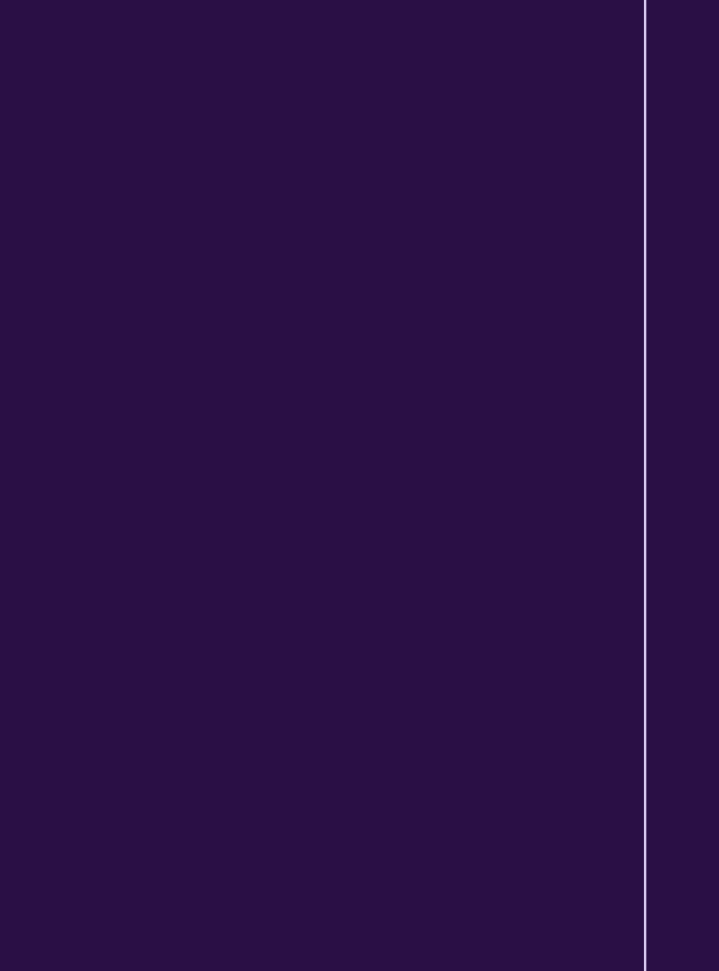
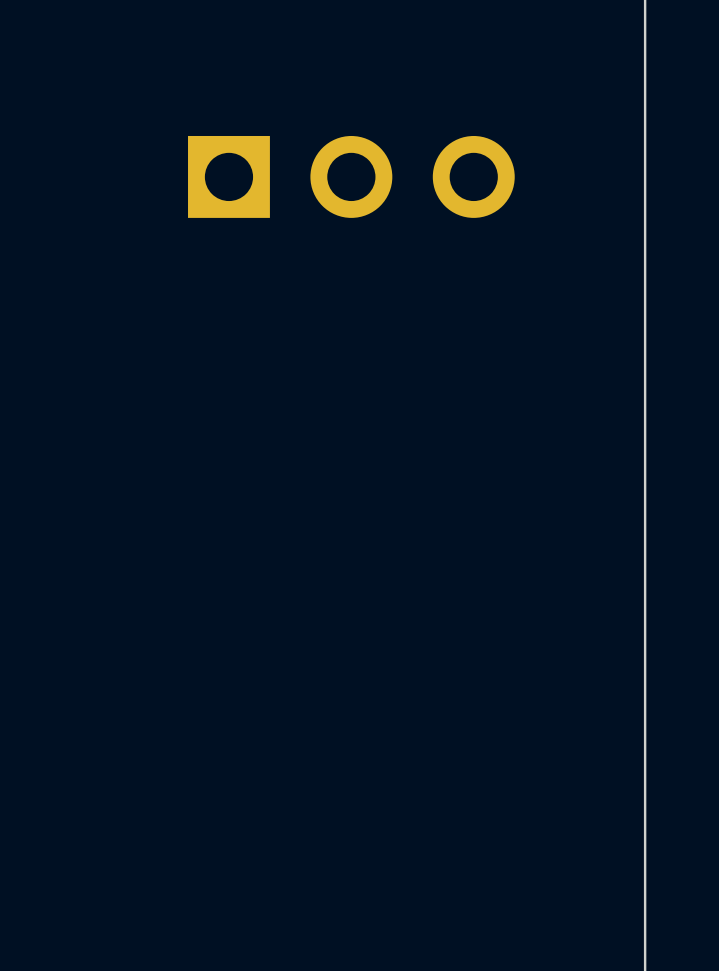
part: none -> (351, 176)

